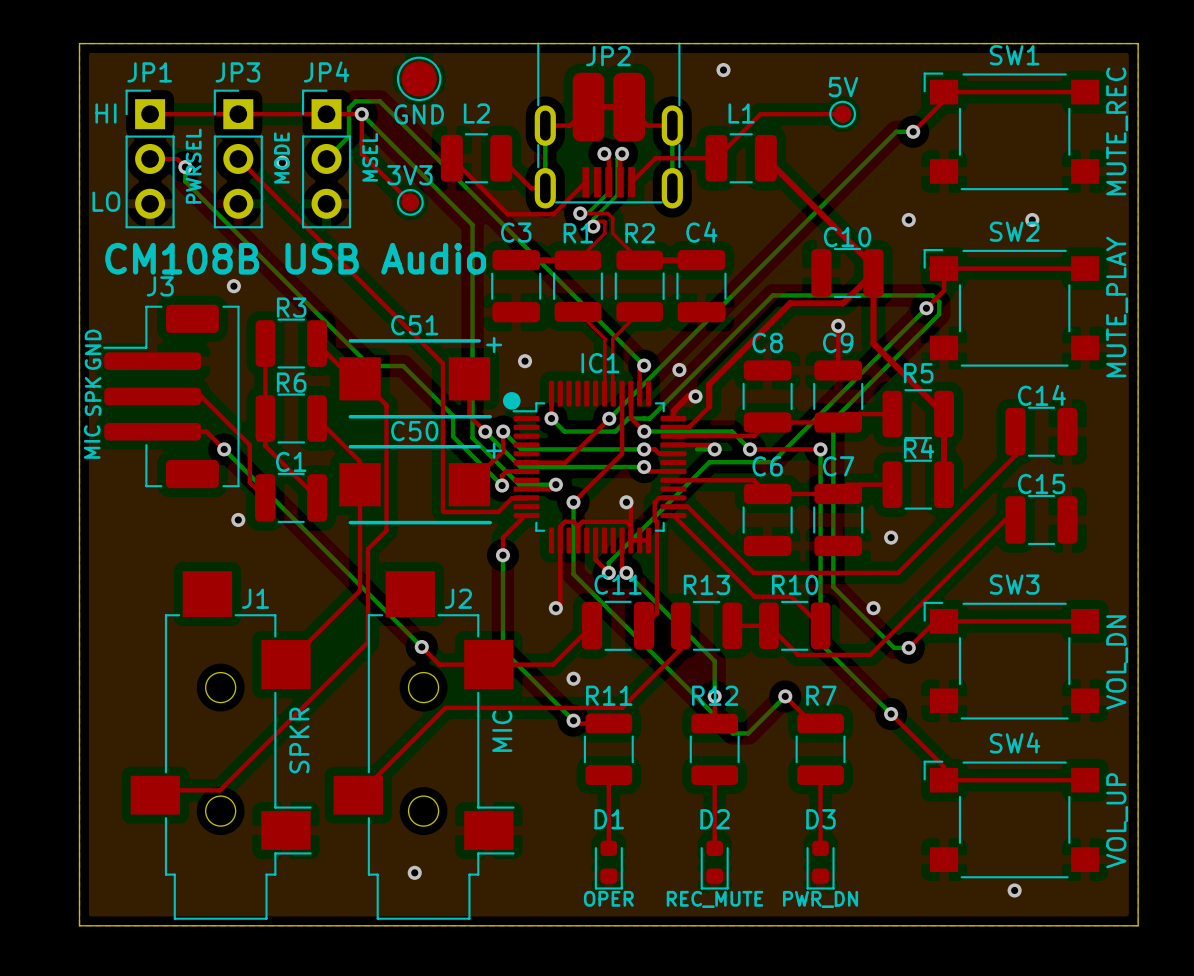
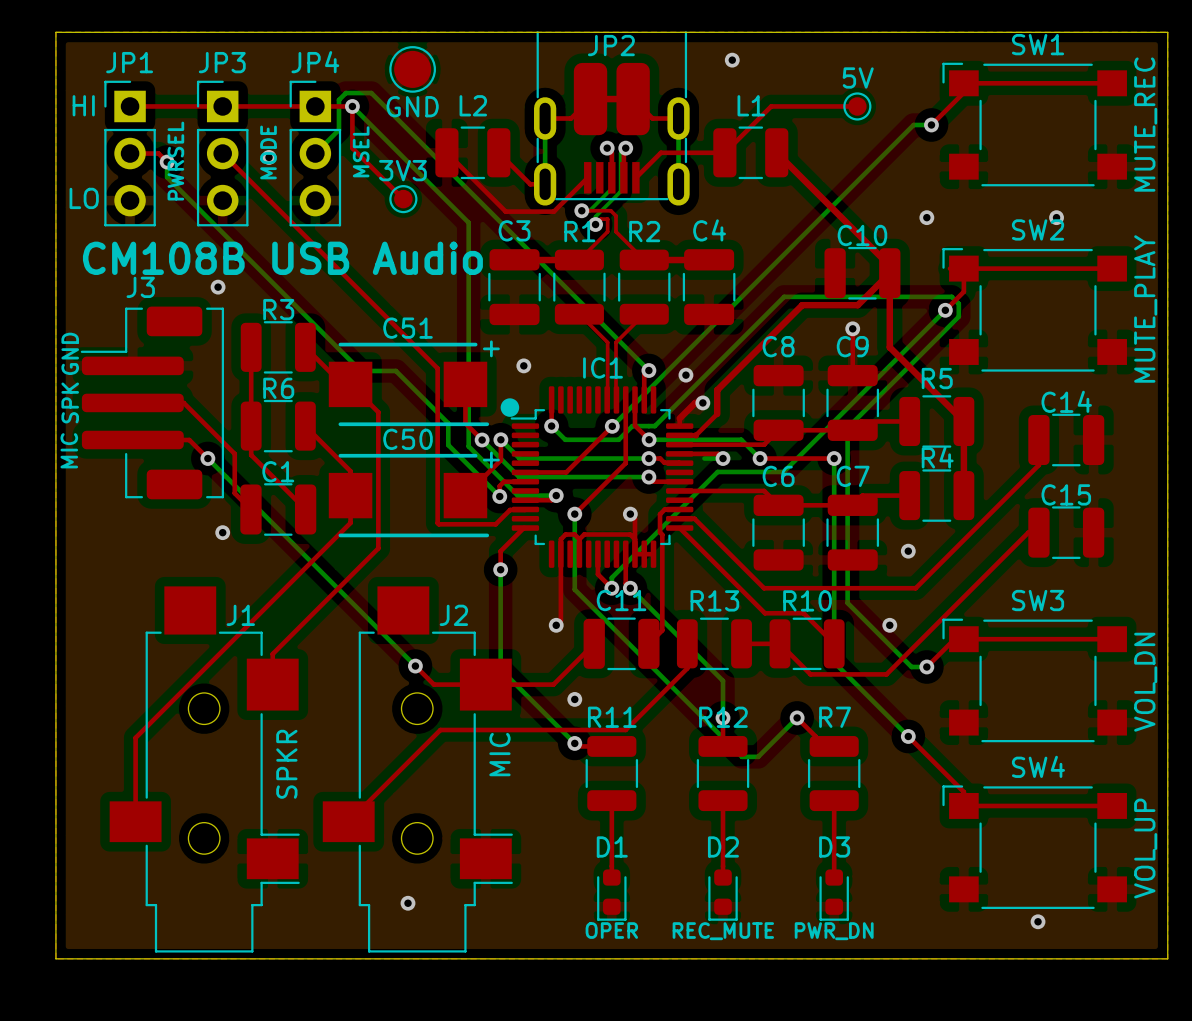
top track: (360, 510) (360, 590) (285, 664) -> (378, 543) (378, 548) (272, 654) (272, 684)
top track: (386, 530) (367, 549) (367, 642) (219, 790) (160, 790) (155, 795) -> (350, 522) (135, 737) (135, 821)

